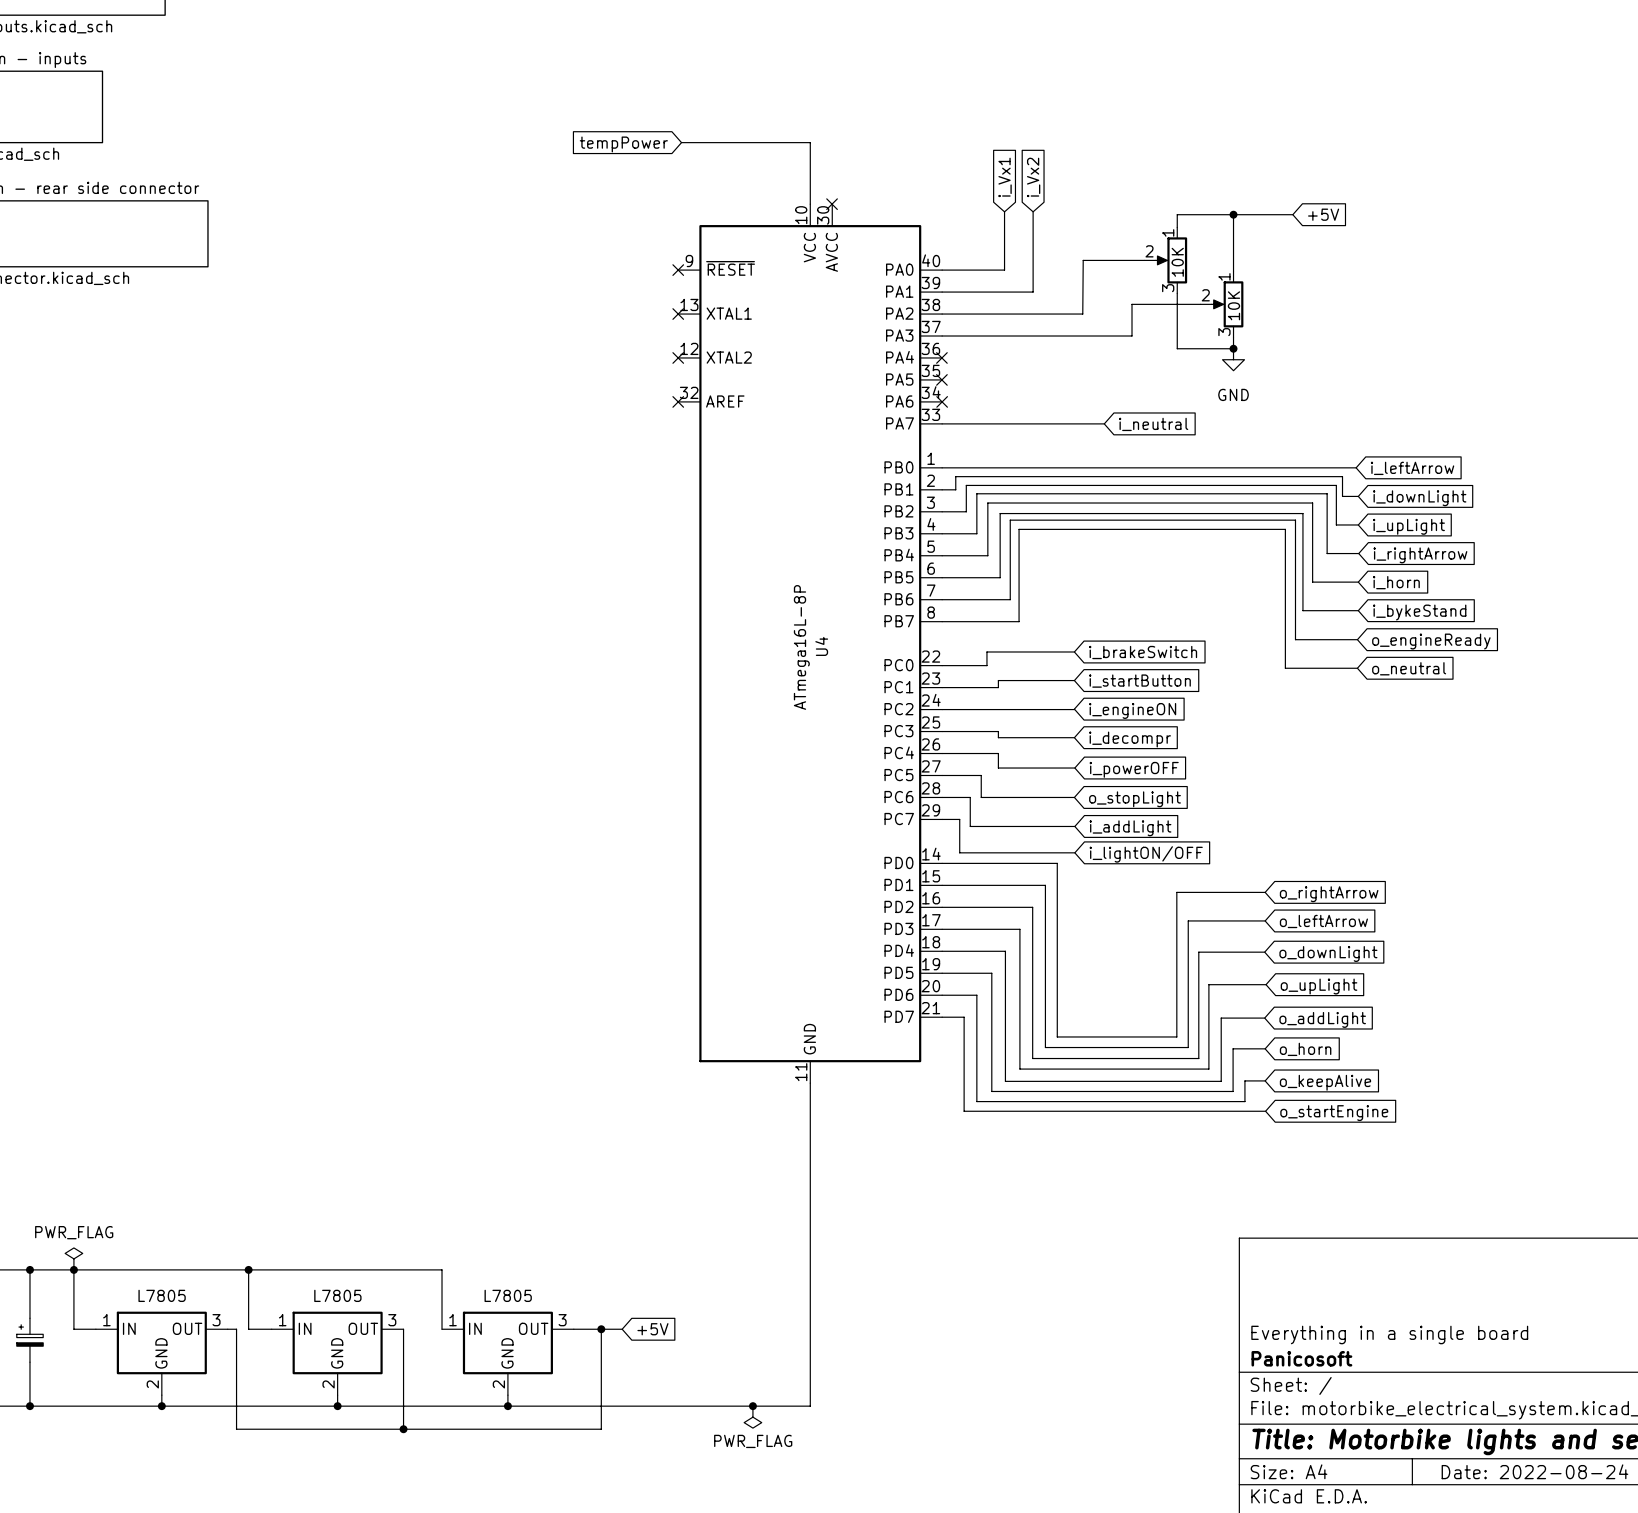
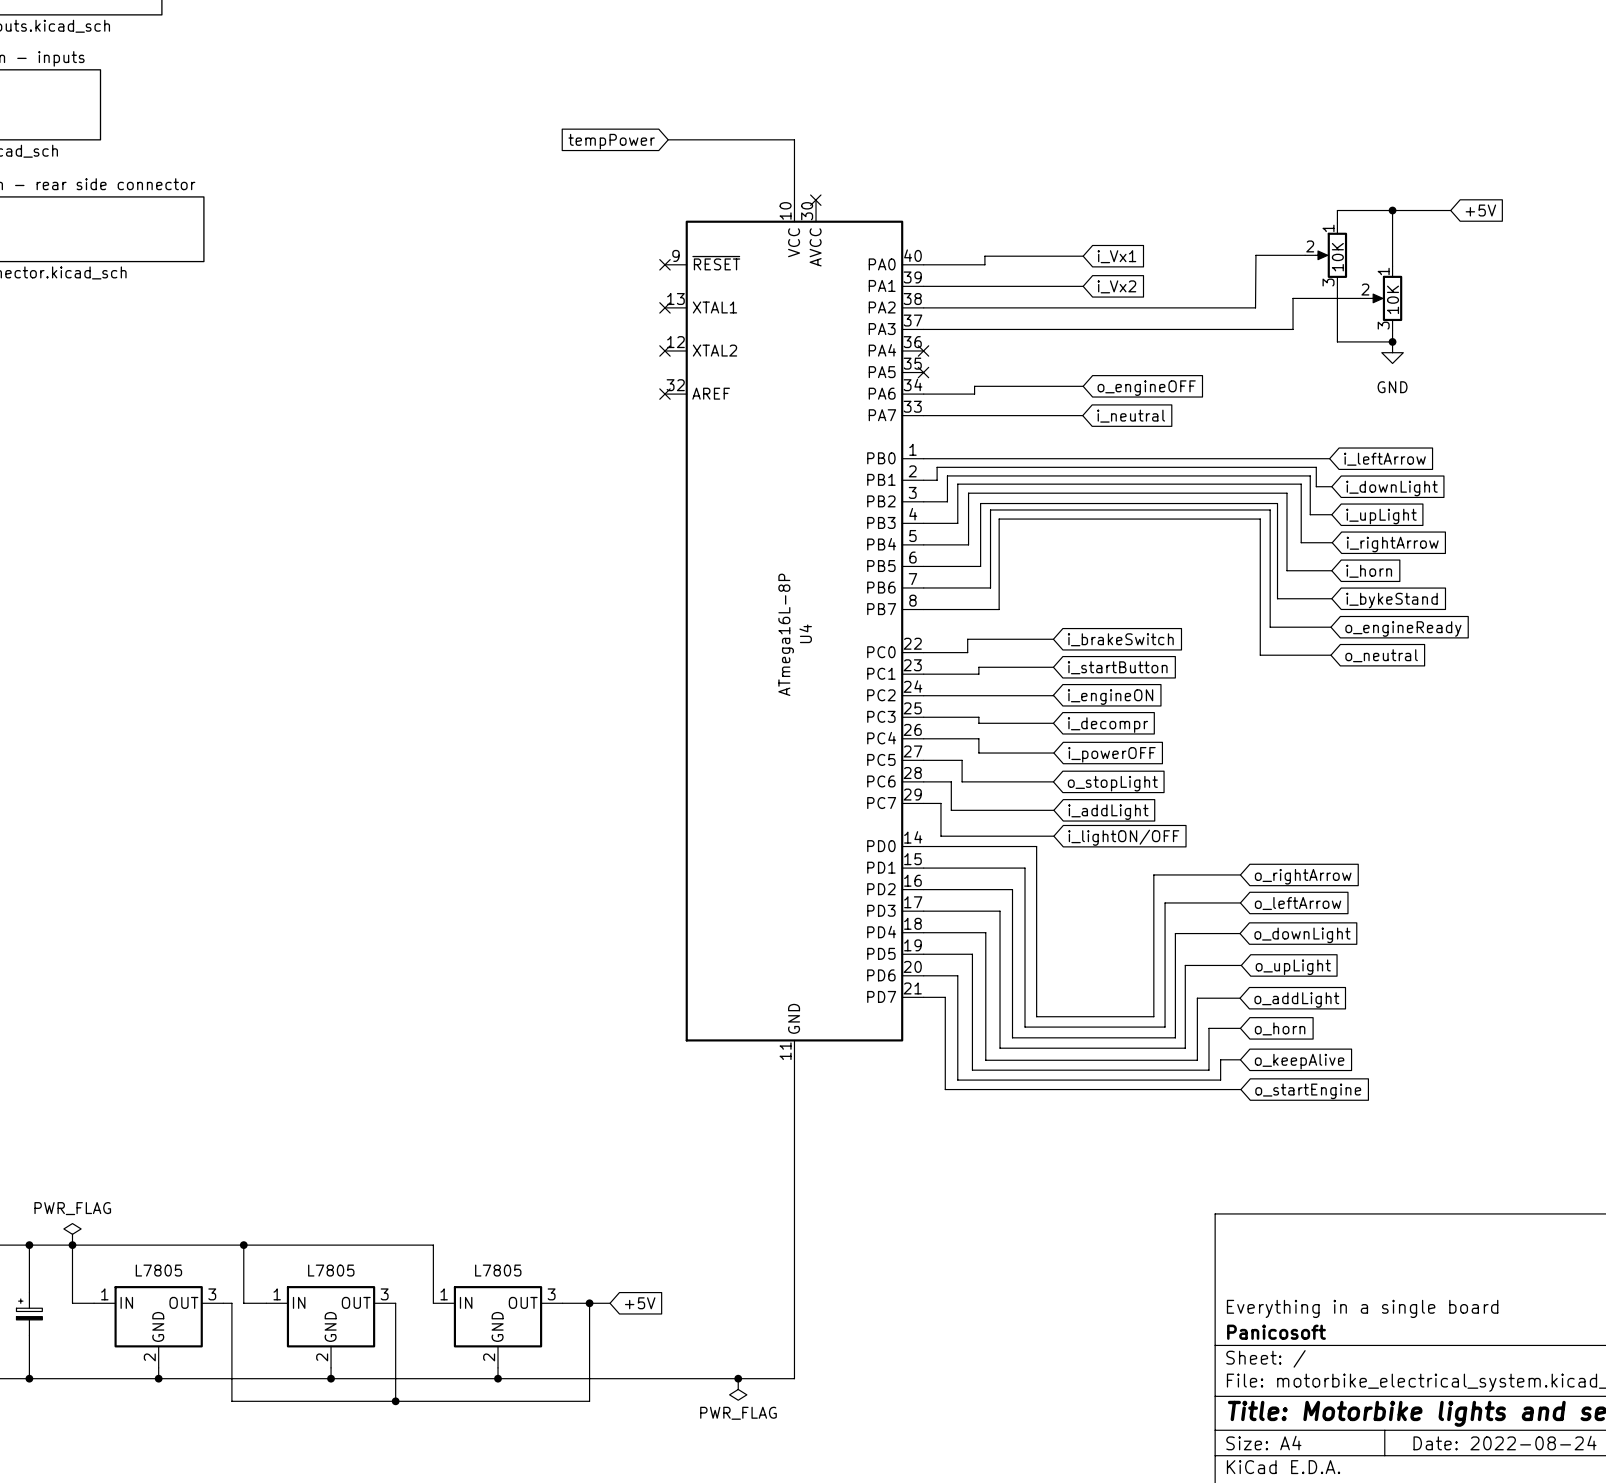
global label rotation: 0° (1005, 177) -> 90° clockwise (1116, 256)
global label position: i_Vx1 (1005, 177) -> i_Vx1 (1116, 256)
global label rotation: 0° (1033, 177) -> 90° clockwise (1116, 286)
global label position: i_Vx2 (1033, 177) -> i_Vx2 (1116, 286)
wire: (1004, 211) (1004, 261) -> (1083, 256) (984, 256)
wire: (1033, 211) (1033, 292) -> (1083, 286) (1012, 286)
wire: (1233, 214) (1233, 271) -> (1392, 210) (1392, 266)
junction: (1233, 214) -> none
wire: (1292, 214) (1177, 214) (1177, 227) -> (1450, 210) (1337, 210) (1337, 223)
global label position: +5V (1323, 214) -> +5V (1480, 210)
junction: none -> (1392, 210)
wire: (1144, 260) (1083, 260) (1082, 314) -> (1305, 255) (1255, 255) (1255, 307) (1061, 307)
part: 10K (1165, 260) -> none
part: none -> 10K (1326, 255)
wire: (1177, 293) (1177, 348) (1233, 348) (1233, 337) -> (1337, 287) (1337, 341) (1392, 341) (1392, 330)
wire: (1200, 304) (1132, 304) (1132, 336) -> (1360, 298) (1293, 298) (1293, 329) (1109, 329)
part: 10K (1221, 304) -> none
part: none -> 10K (1381, 298)
junction: (1233, 348) -> none
junction: none -> (1392, 341)
power symbol position: GND (1233, 359) -> GND (1392, 352)
wire: none -> (1083, 386) (974, 386) (974, 394) (923, 394)
global label: none -> o_engineOFF (1146, 388)
no-connect mark: (942, 401) -> none

